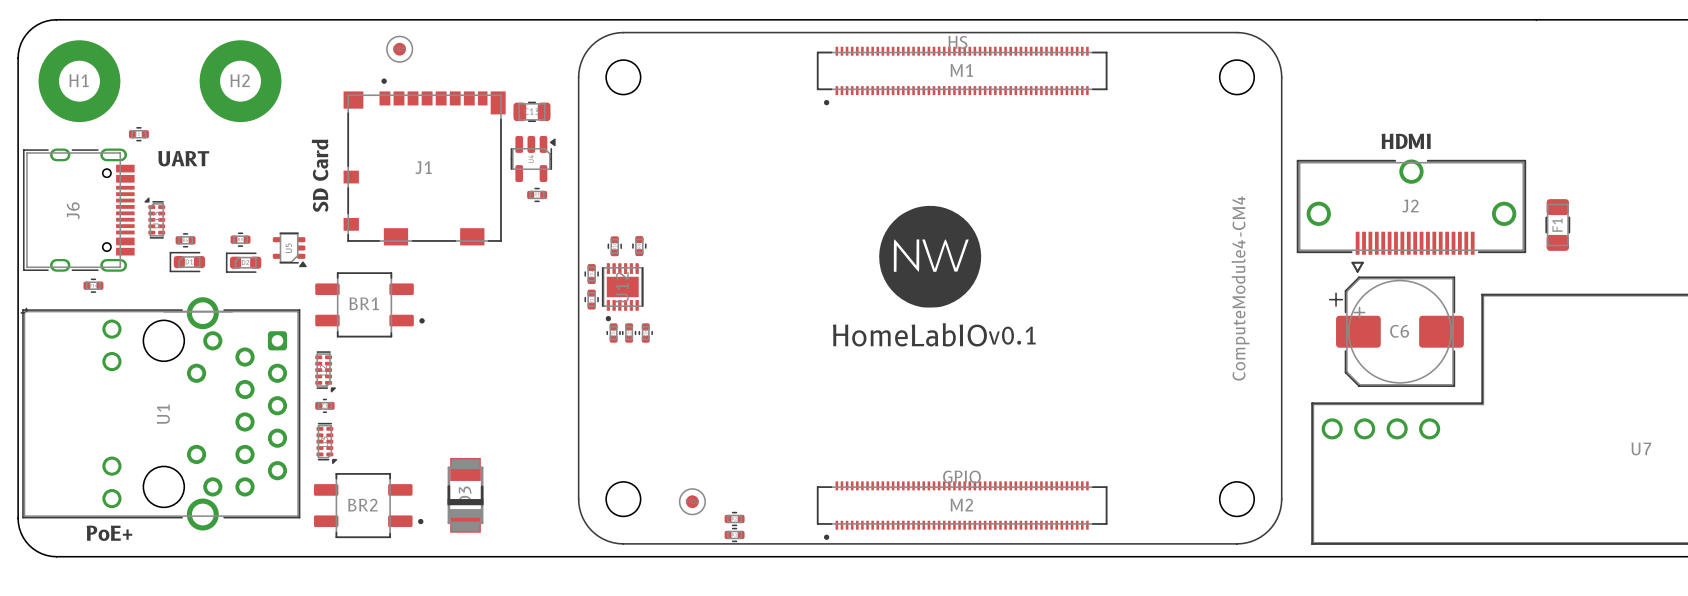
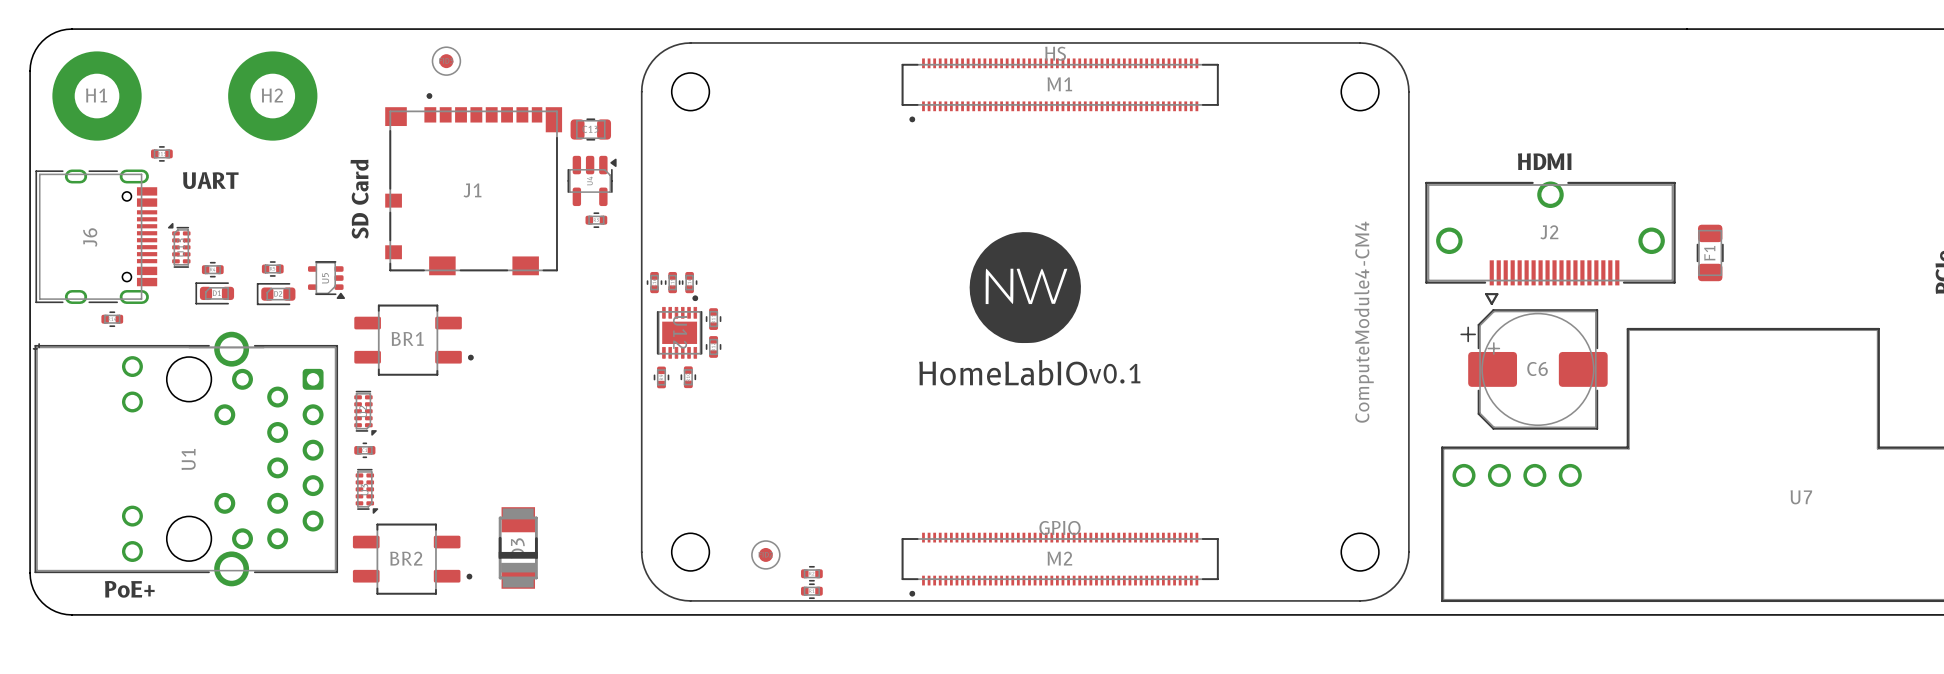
part position: (614, 246) -> (688, 377)
part position: (639, 246) -> (661, 377)
part position: (591, 274) -> (713, 346)
part rotation: 0° (622, 292) -> 180° (679, 327)
part position: (591, 299) -> (713, 319)
part position: (613, 333) -> (689, 282)
part position: (629, 333) -> (672, 282)
part position: (645, 333) -> (654, 282)

